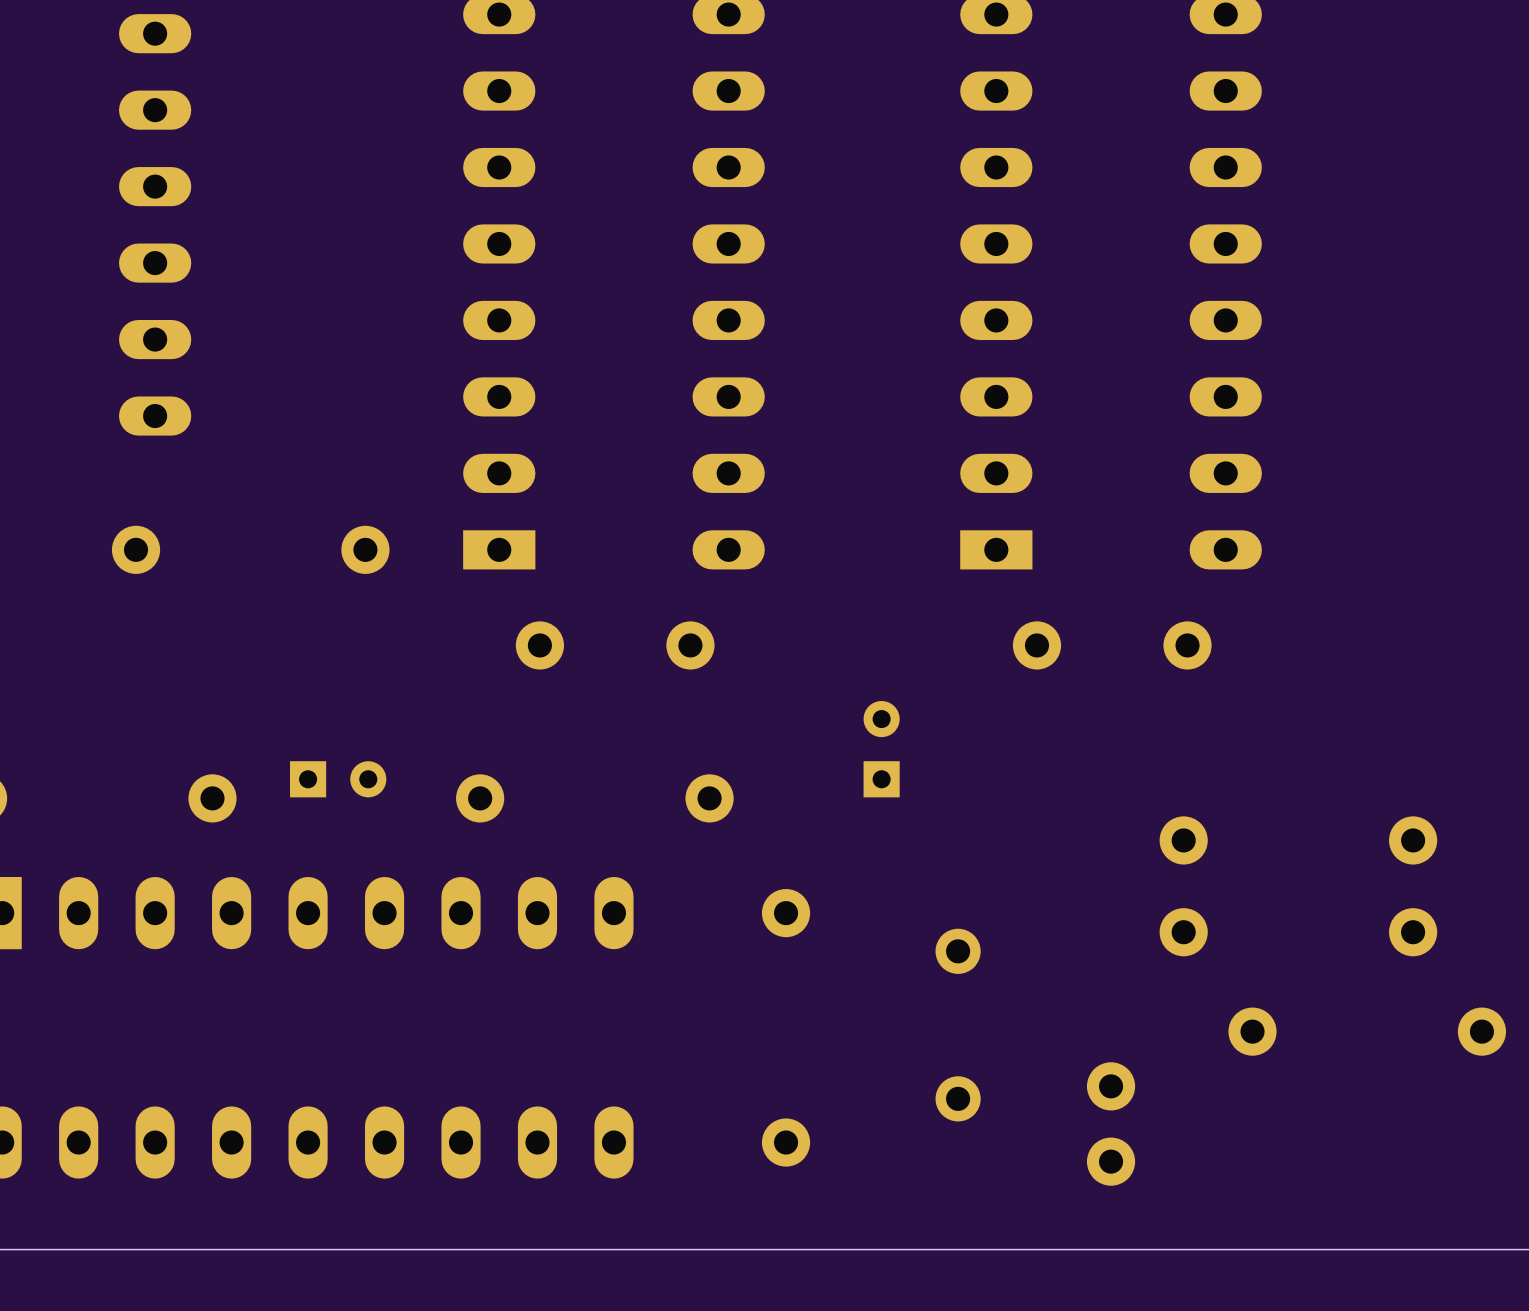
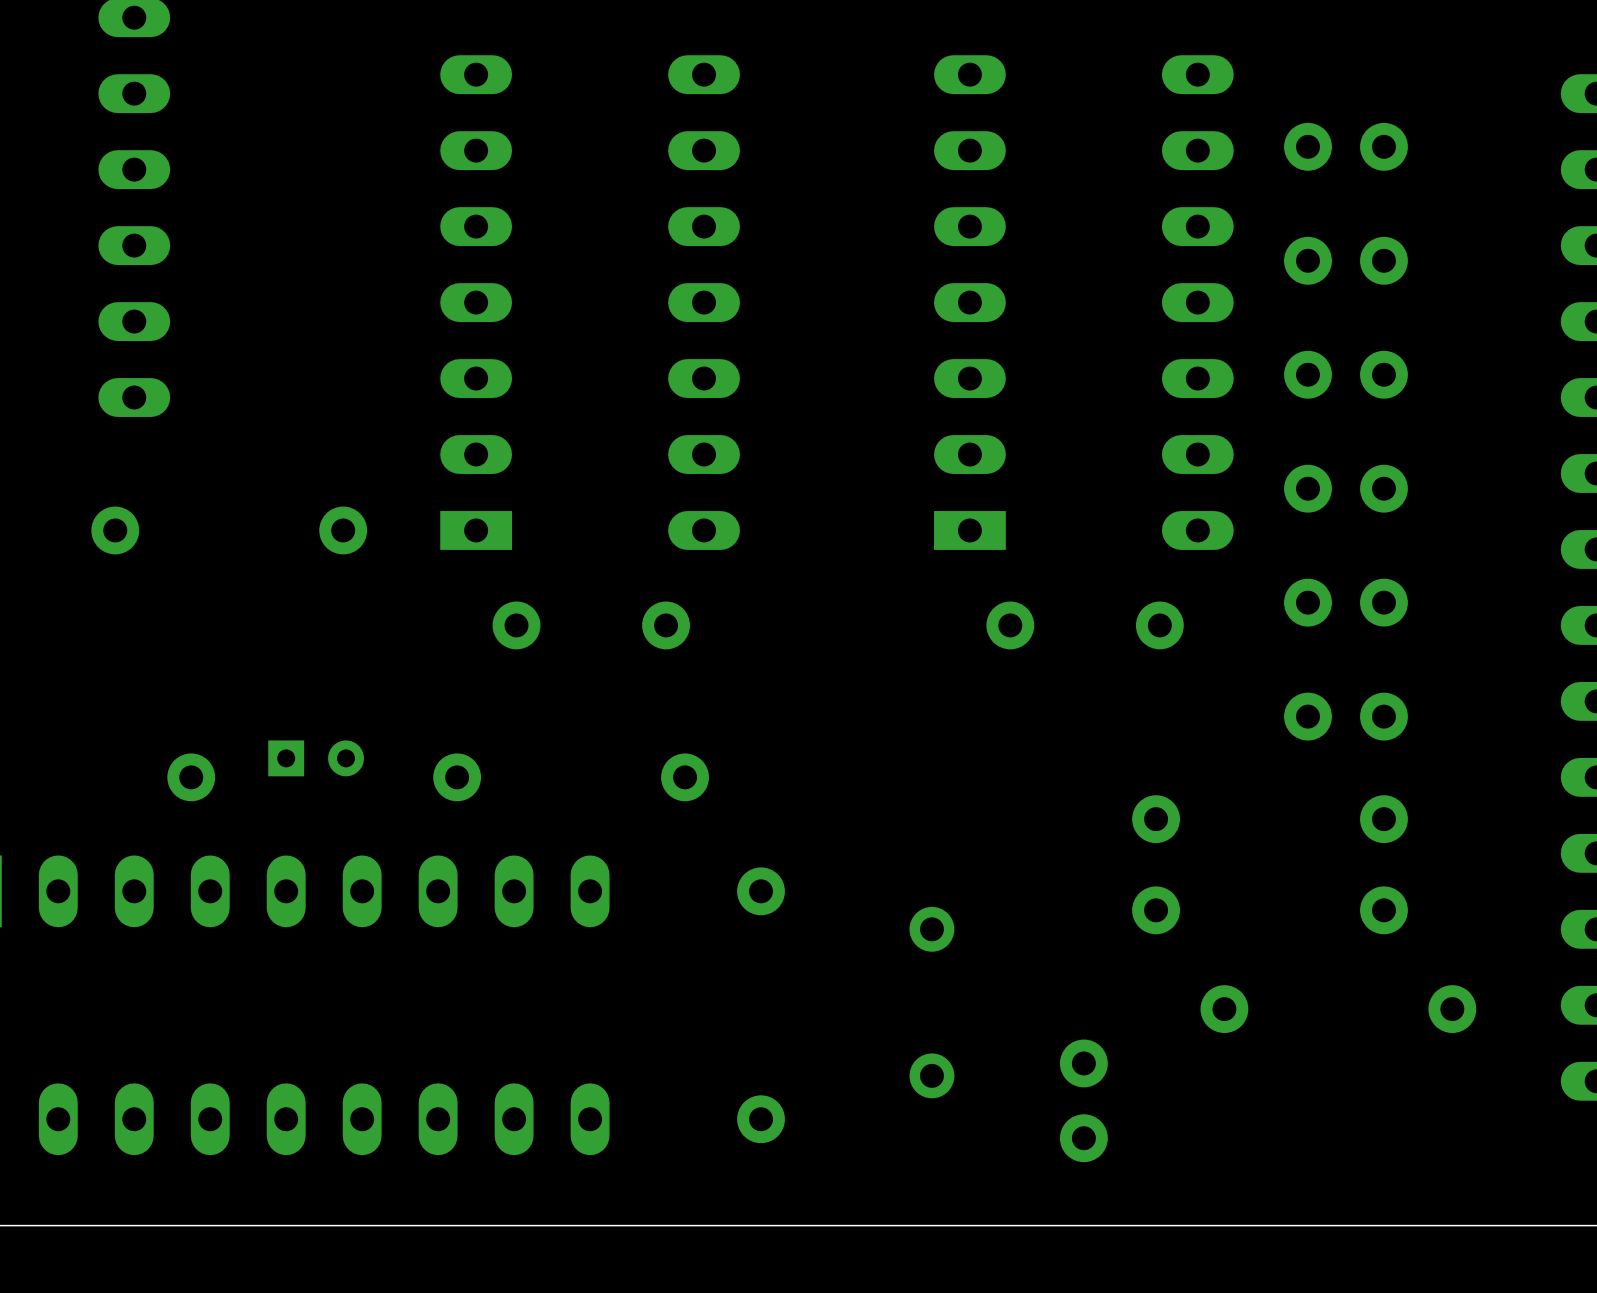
part: none -> (1345, 146)
part: none -> (1345, 260)
part: none -> (1345, 374)
part: none -> (1345, 488)
part: none -> (1345, 602)
part: none -> (1345, 716)
part: (881, 749) -> none

